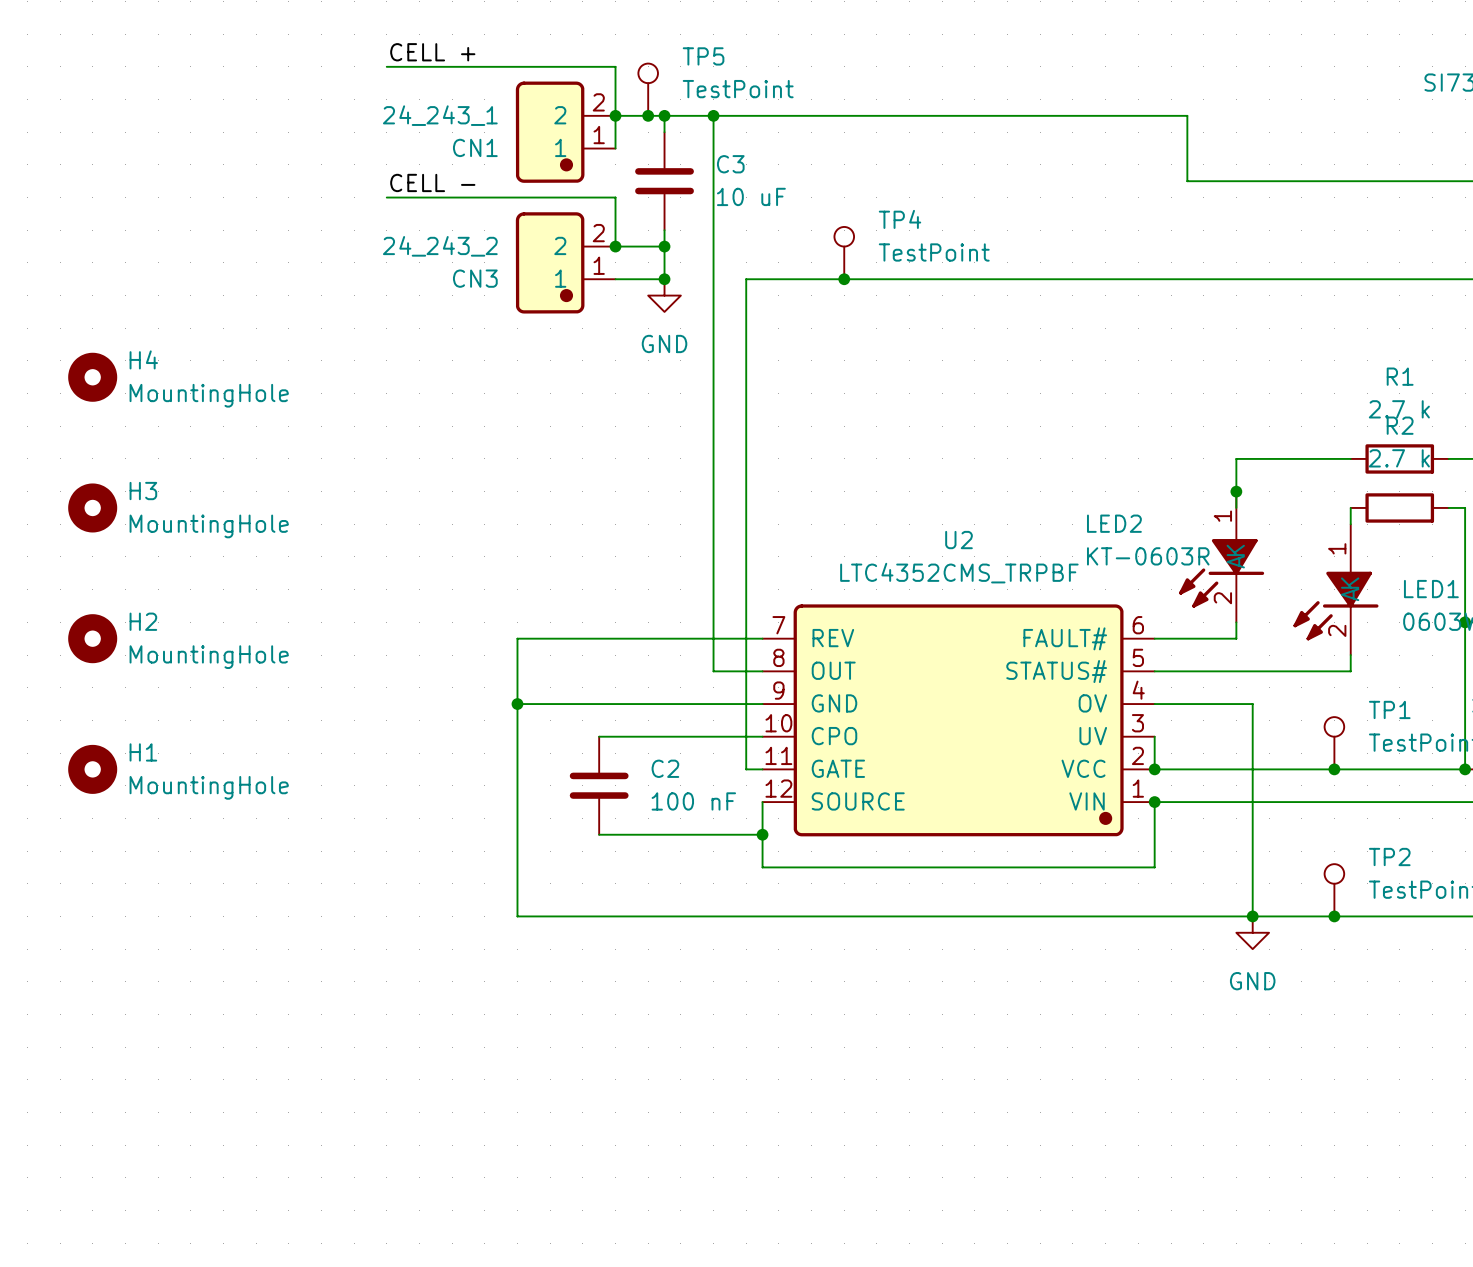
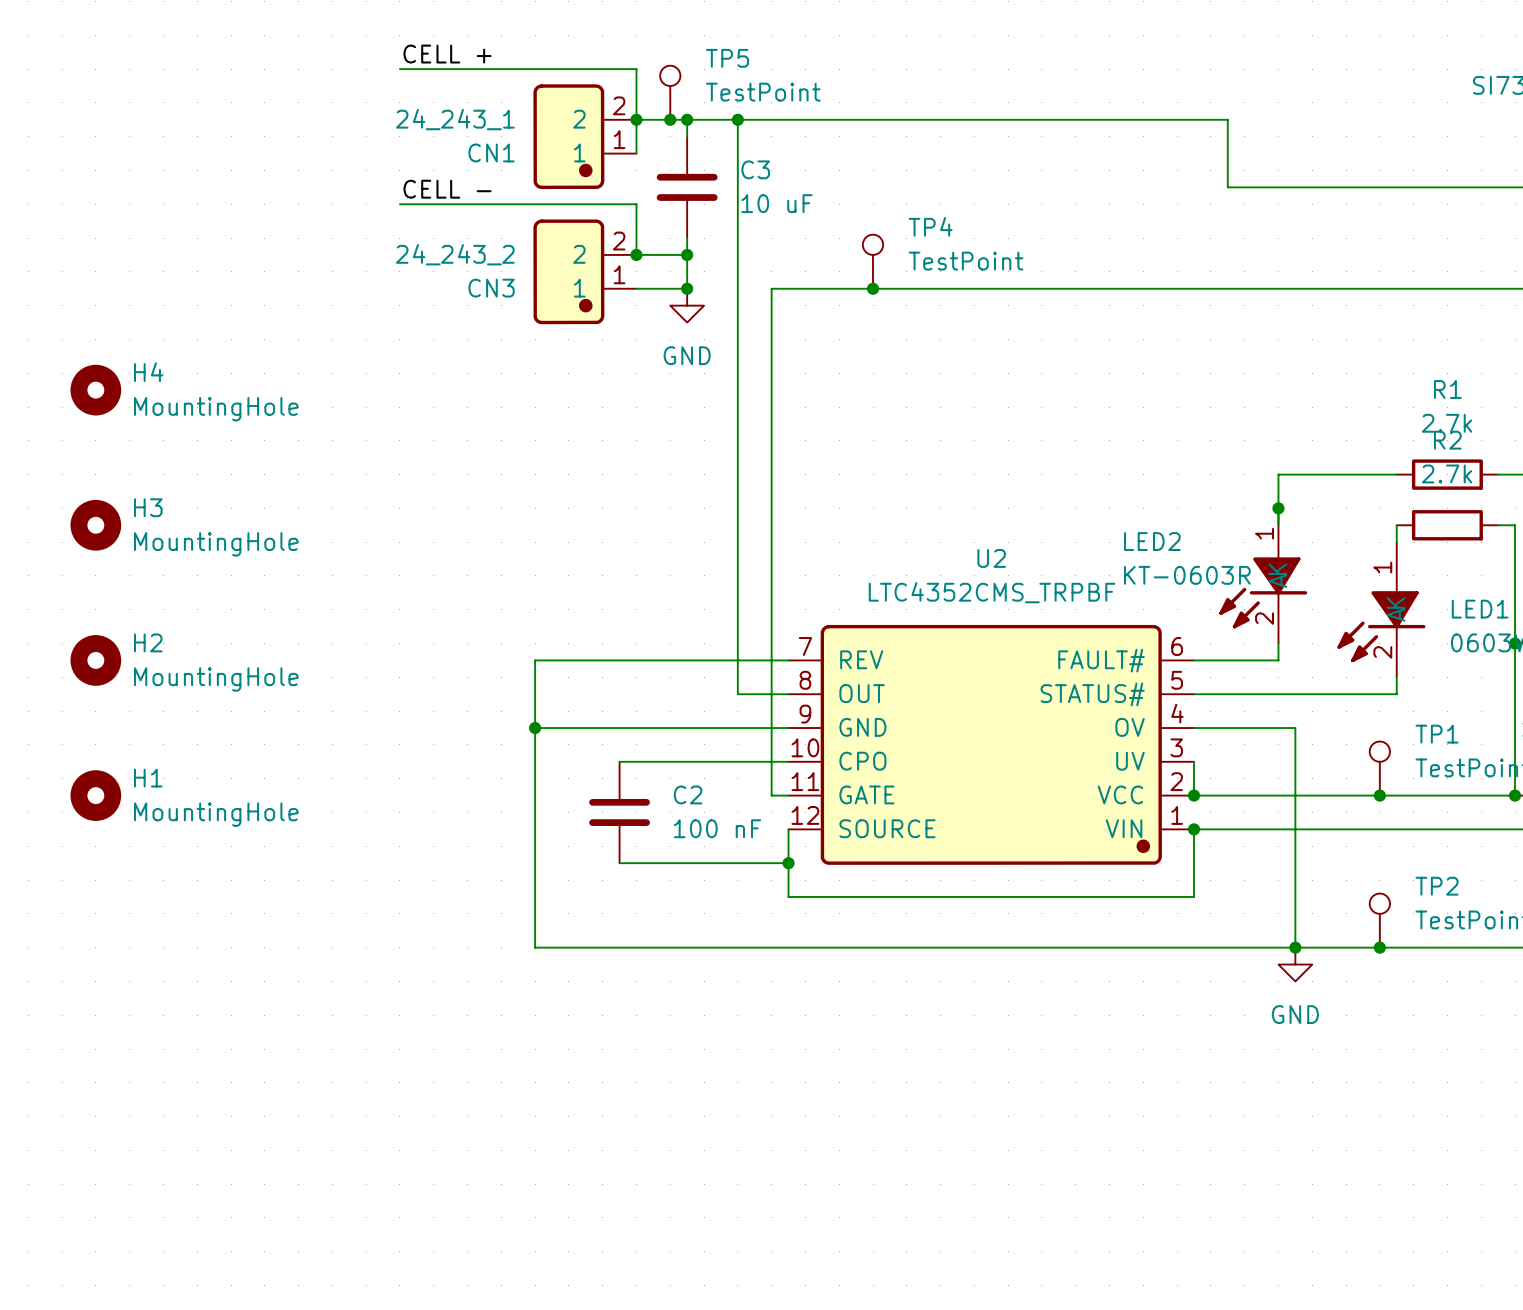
R1 value: 2.7 k (1399, 409) -> 2.7k (1447, 423)
R2 value: 2.7 k (1399, 458) -> 2.7k (1447, 473)

